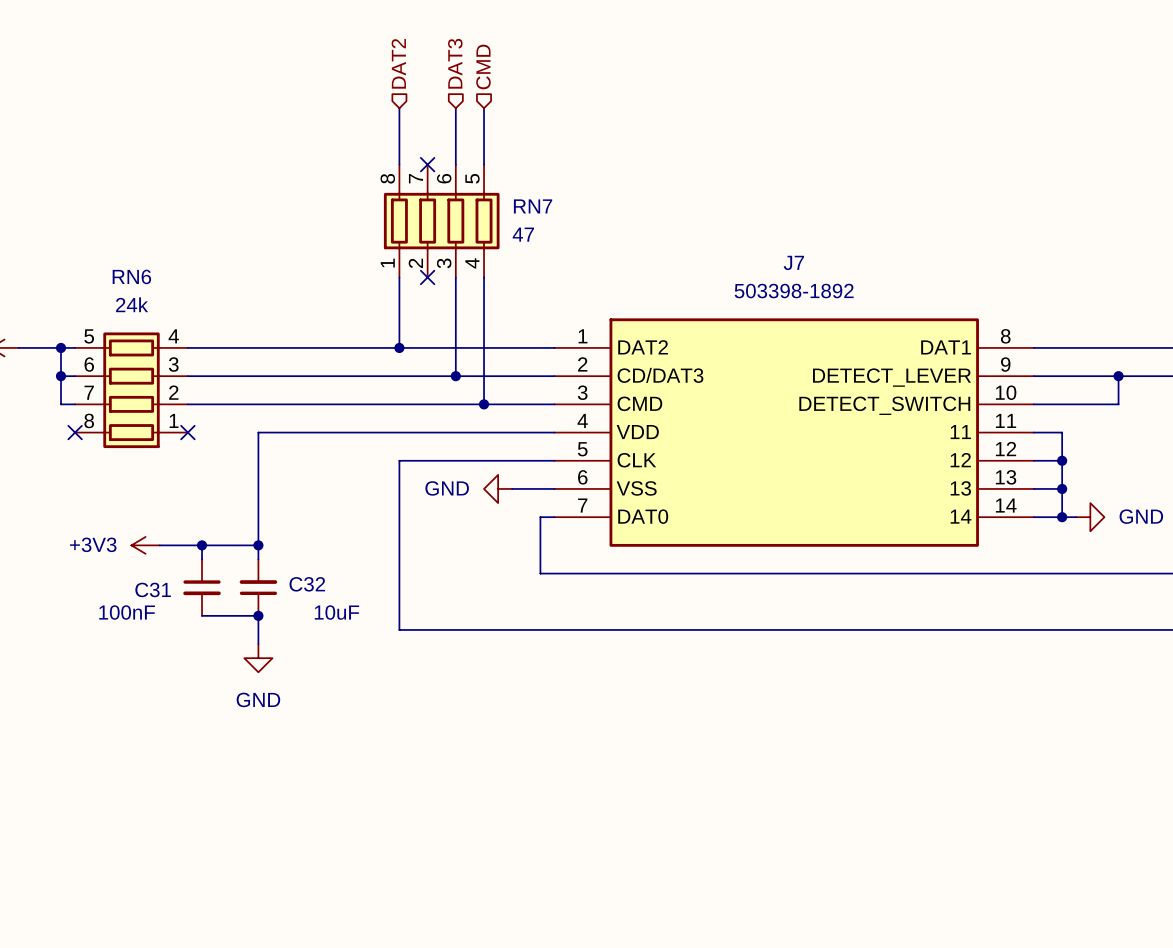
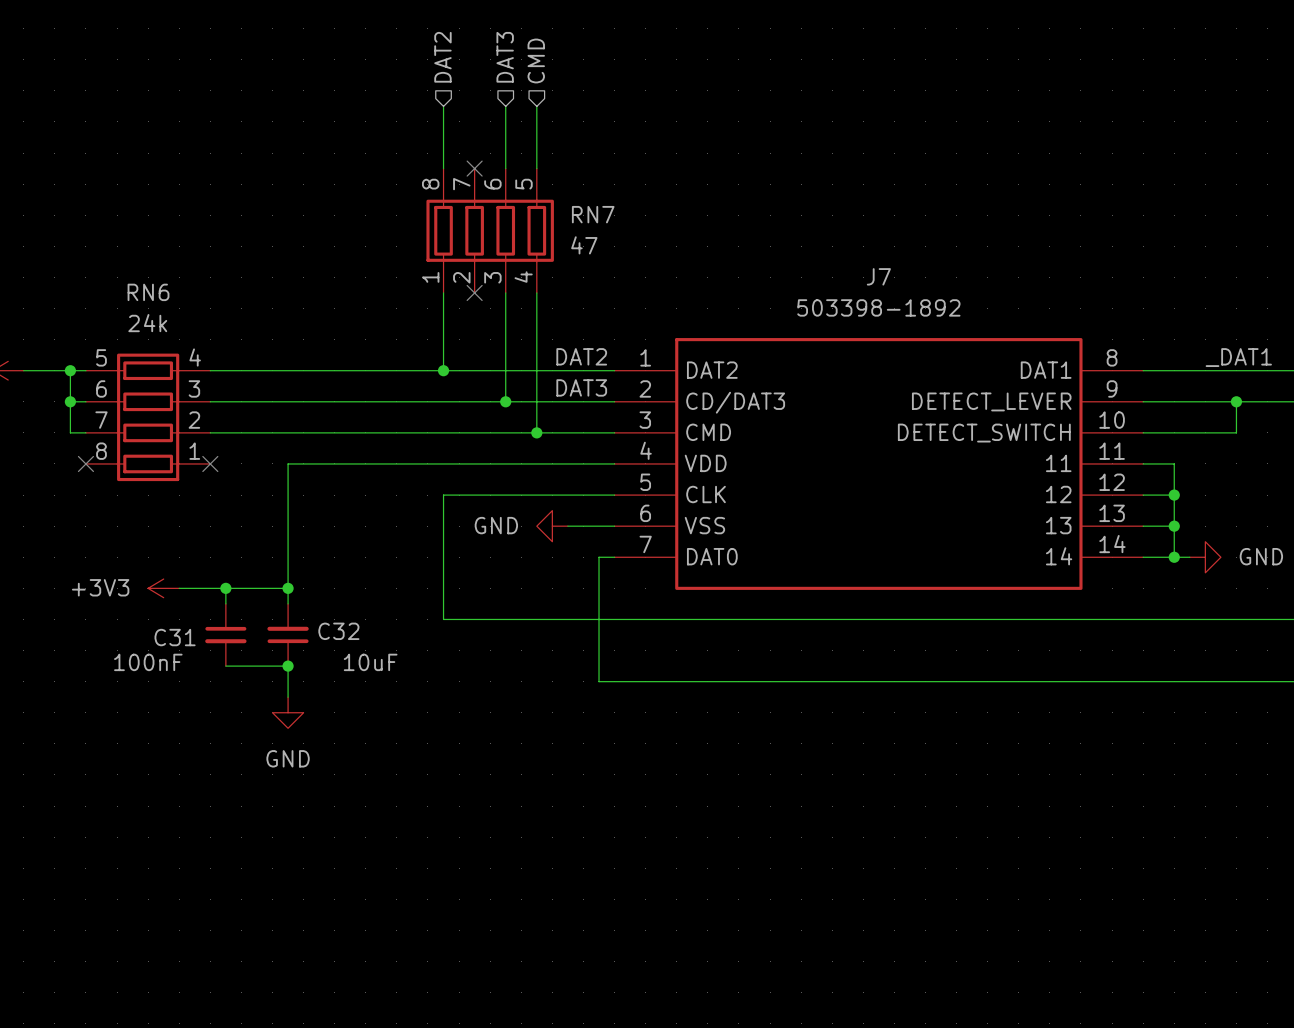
label: none -> DAT2 (581, 356)
label: none -> _DAT1 (1238, 357)
label: none -> DAT3 (581, 387)
wire: (399, 573) (399, 629) (540, 629) -> (443, 619) (599, 619) (599, 681)

